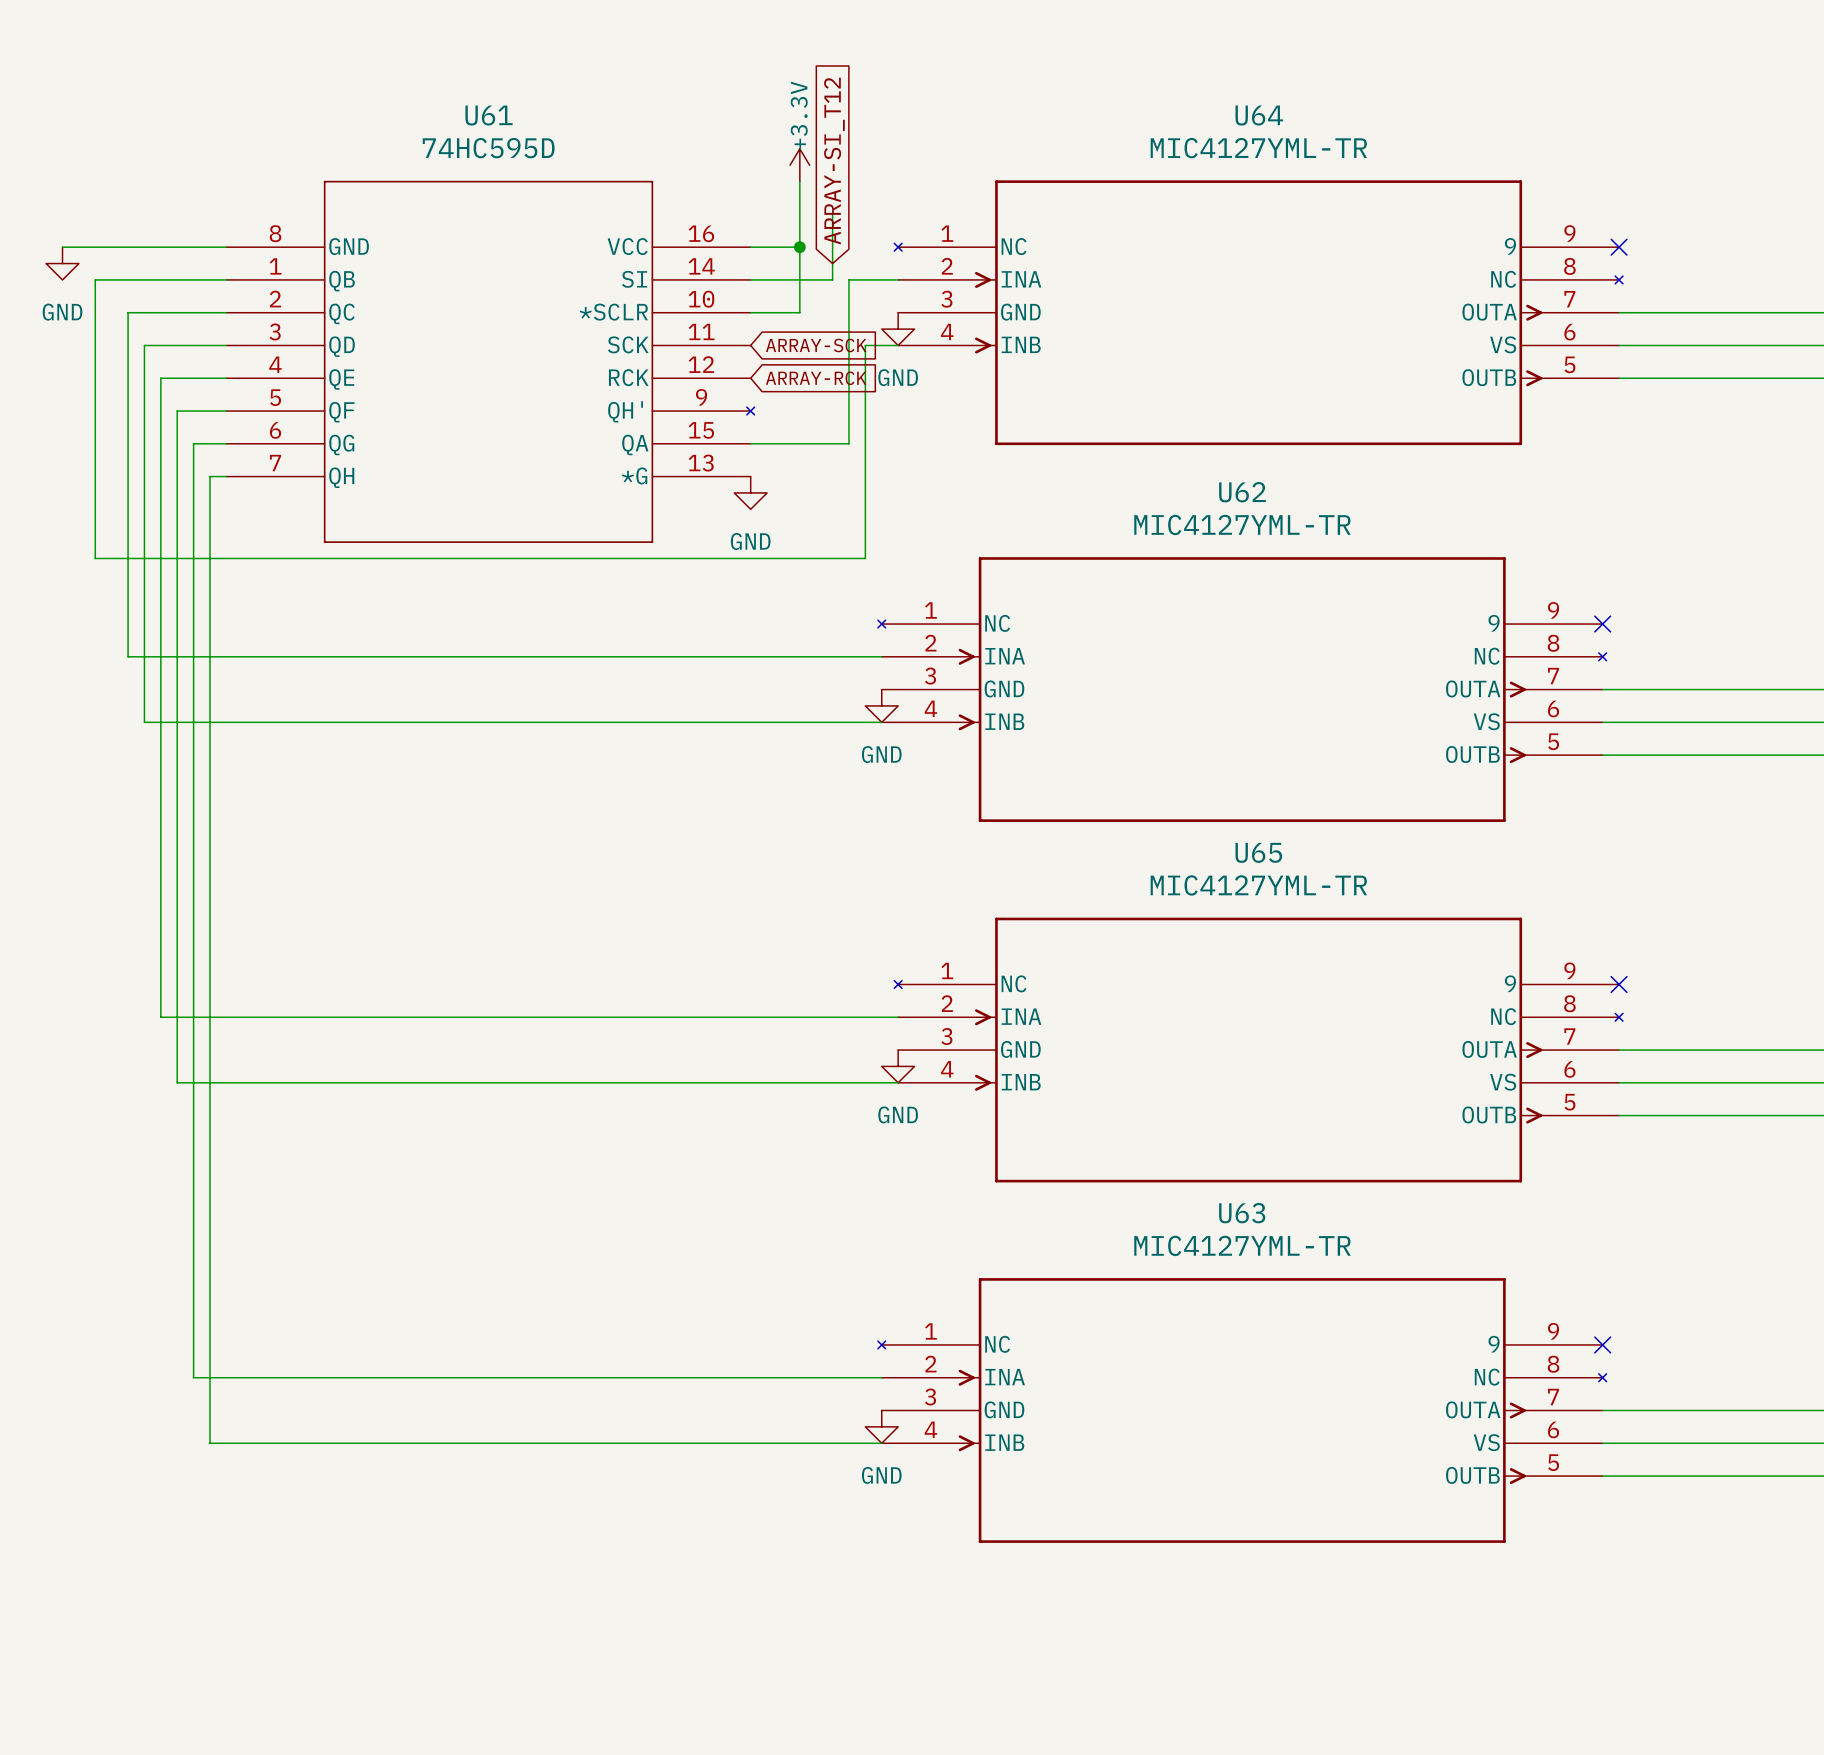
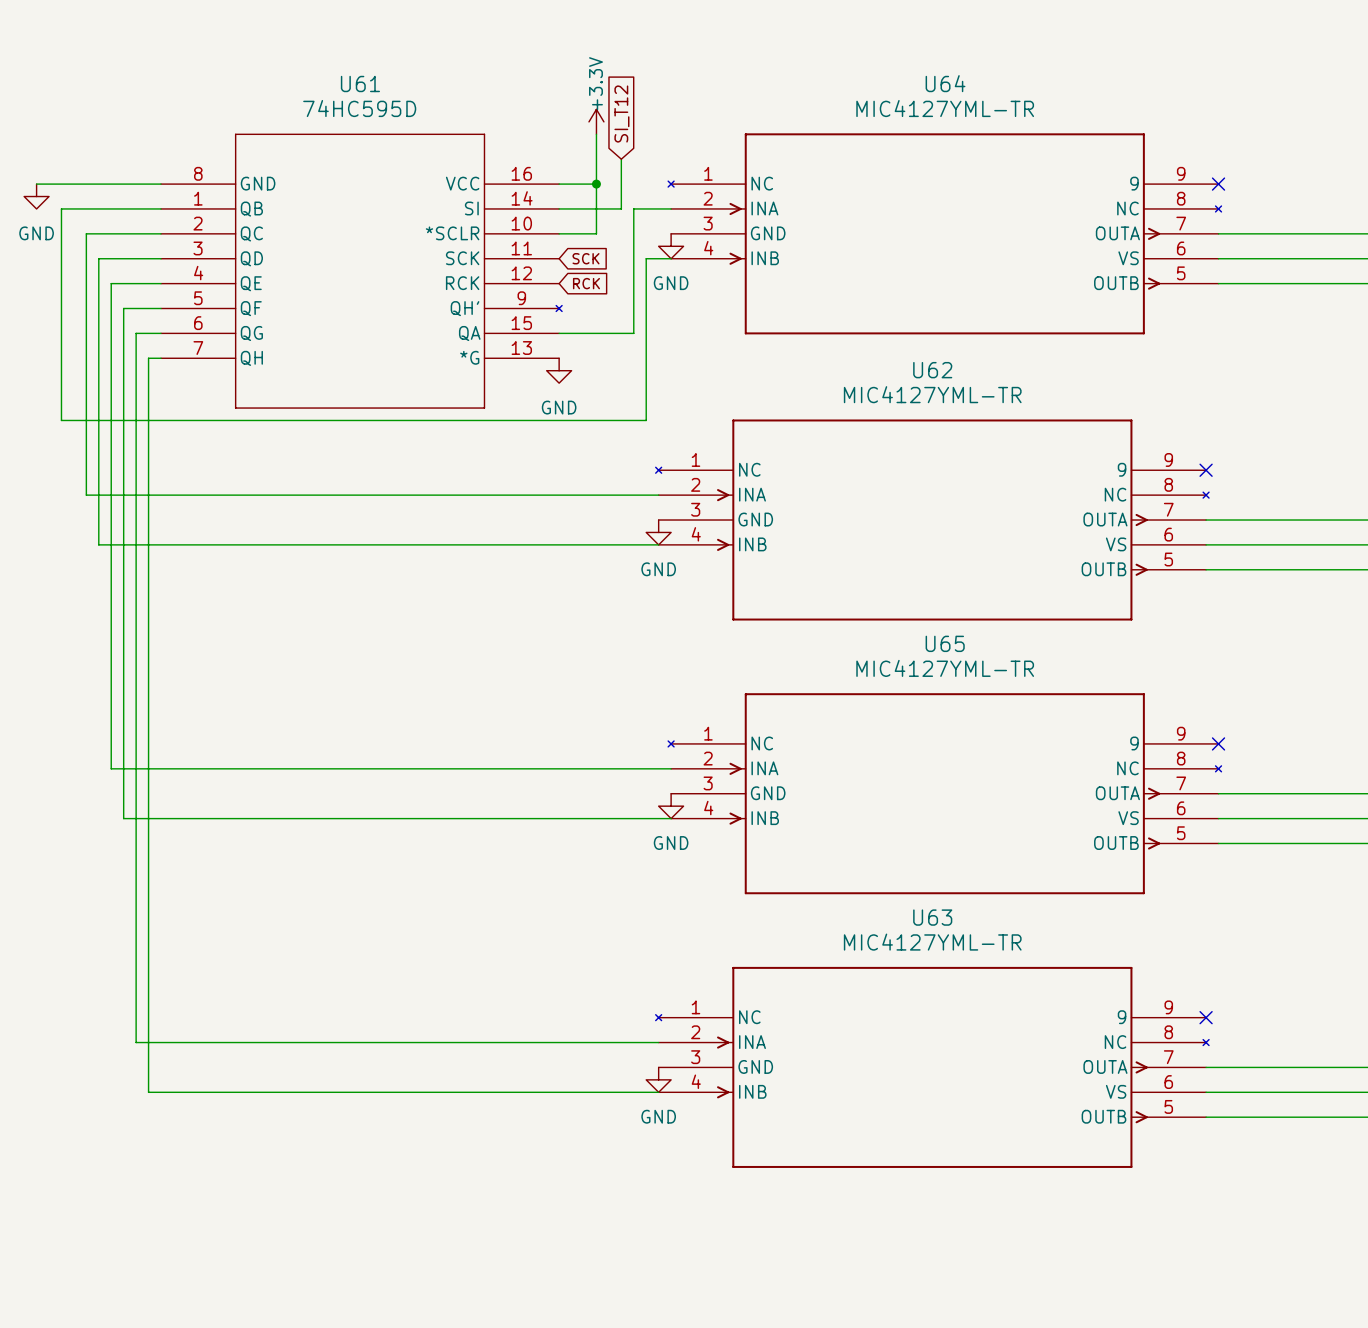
global label: ARRAY-SI_T12 (834, 161) -> SI_T12 (621, 114)
global label: ARRAY-SCK (816, 345) -> SCK (586, 258)
global label: ARRAY-RCK (816, 378) -> RCK (586, 283)

